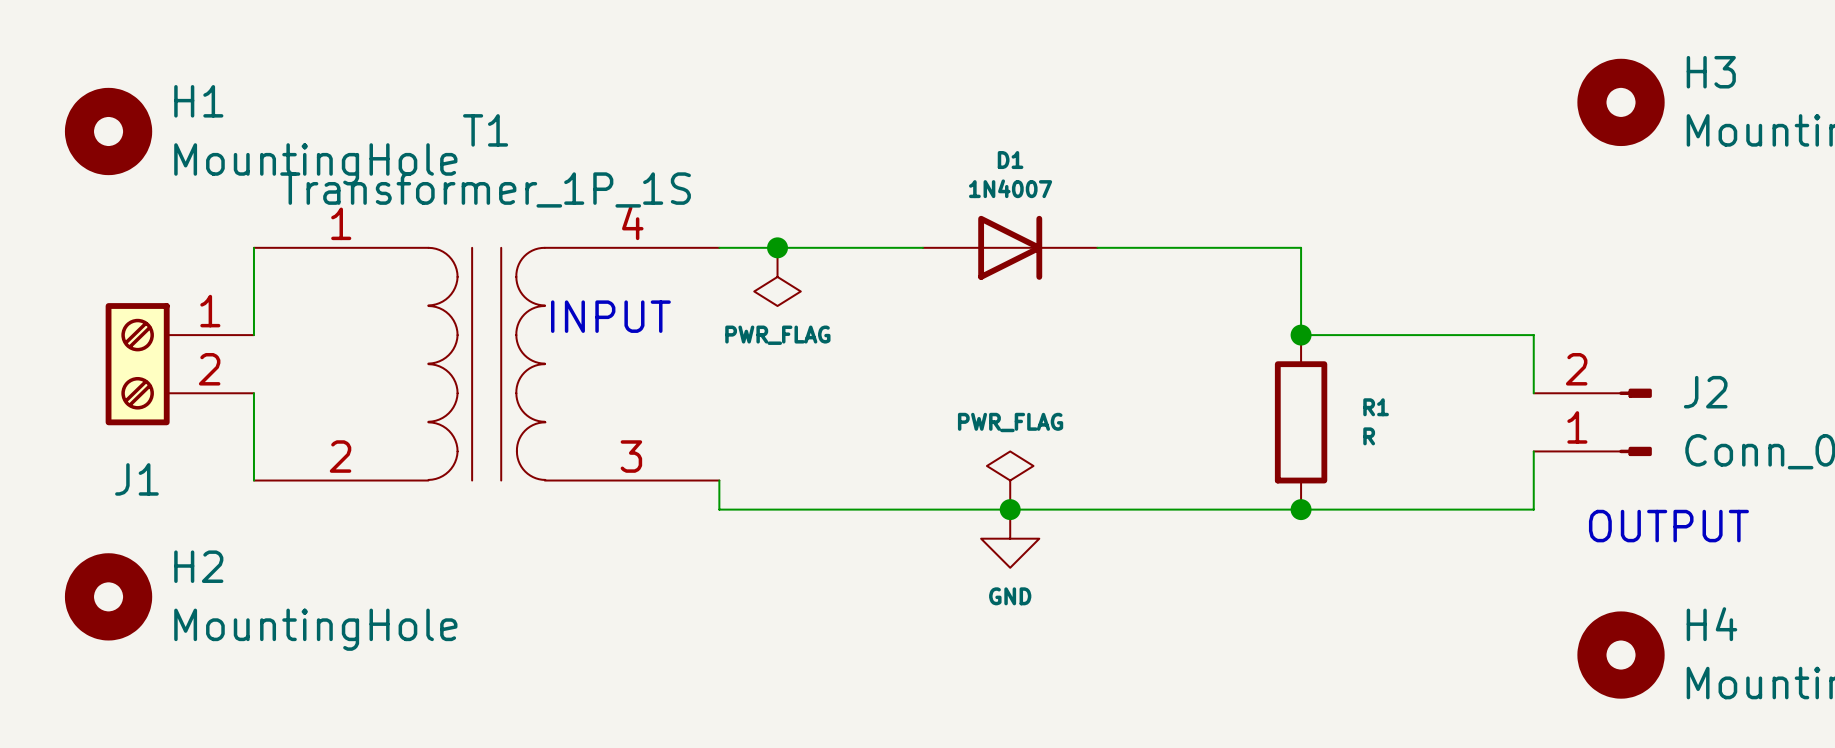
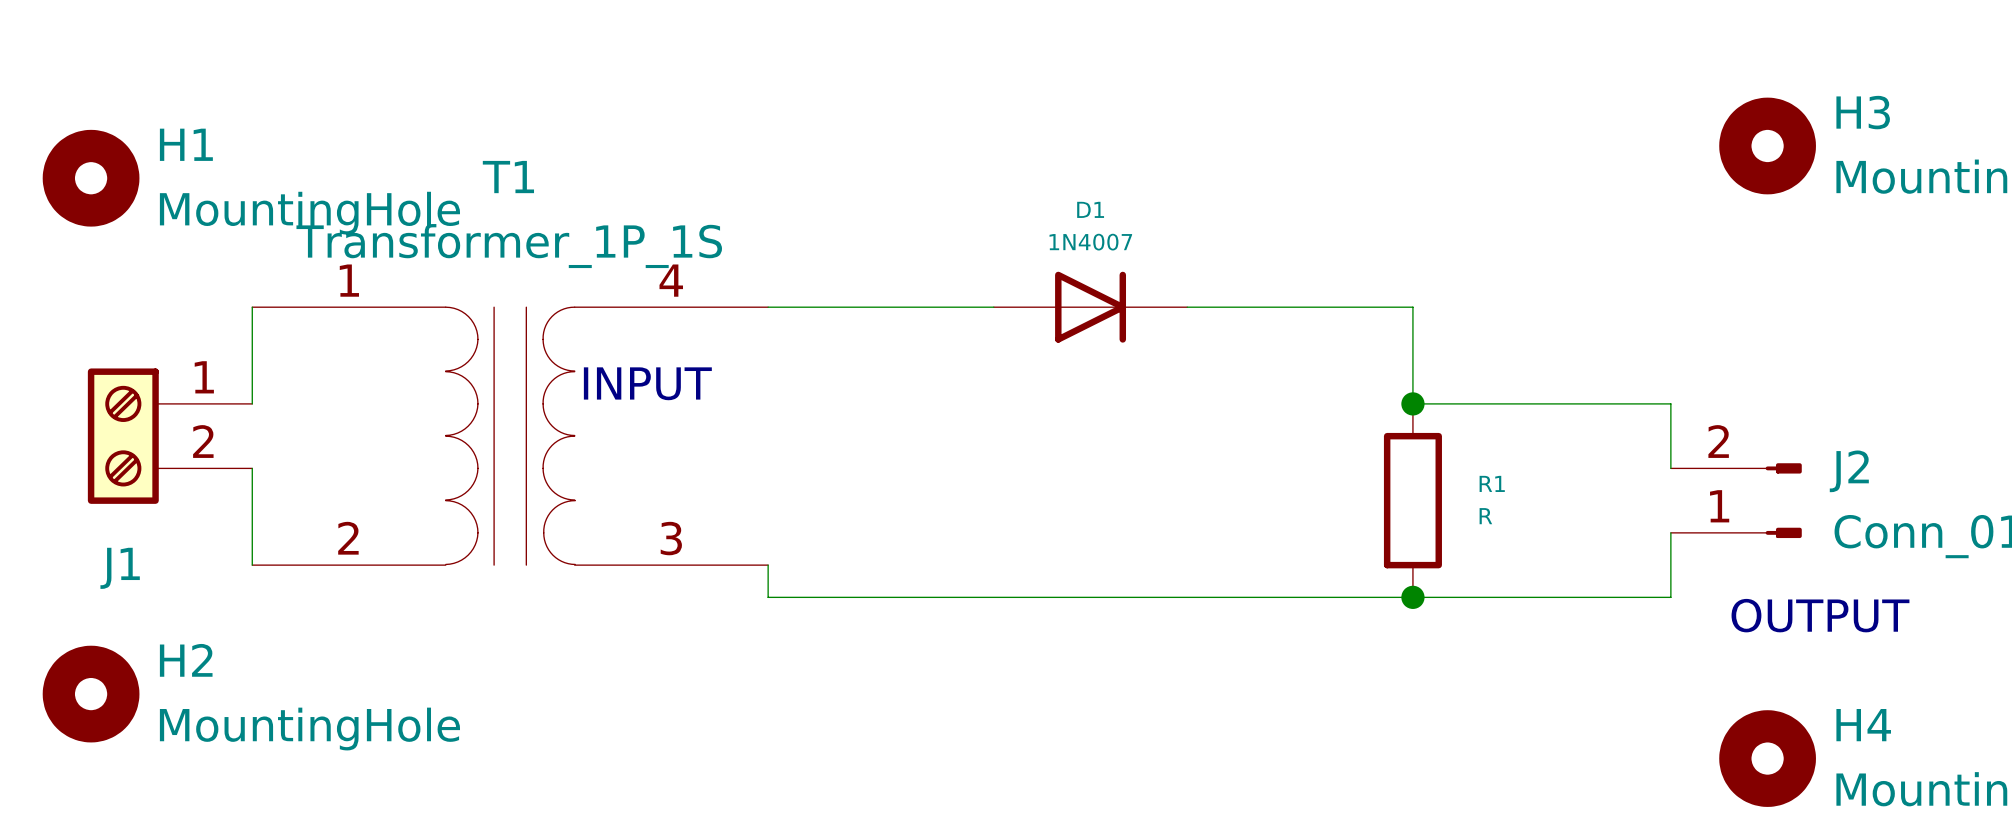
junction: (777, 247) -> none
power symbol: PWR_FLAG (777, 276) -> none
power symbol: PWR_FLAG (1010, 480) -> none
junction: (1010, 509) -> none
power symbol: GND (1010, 538) -> none

